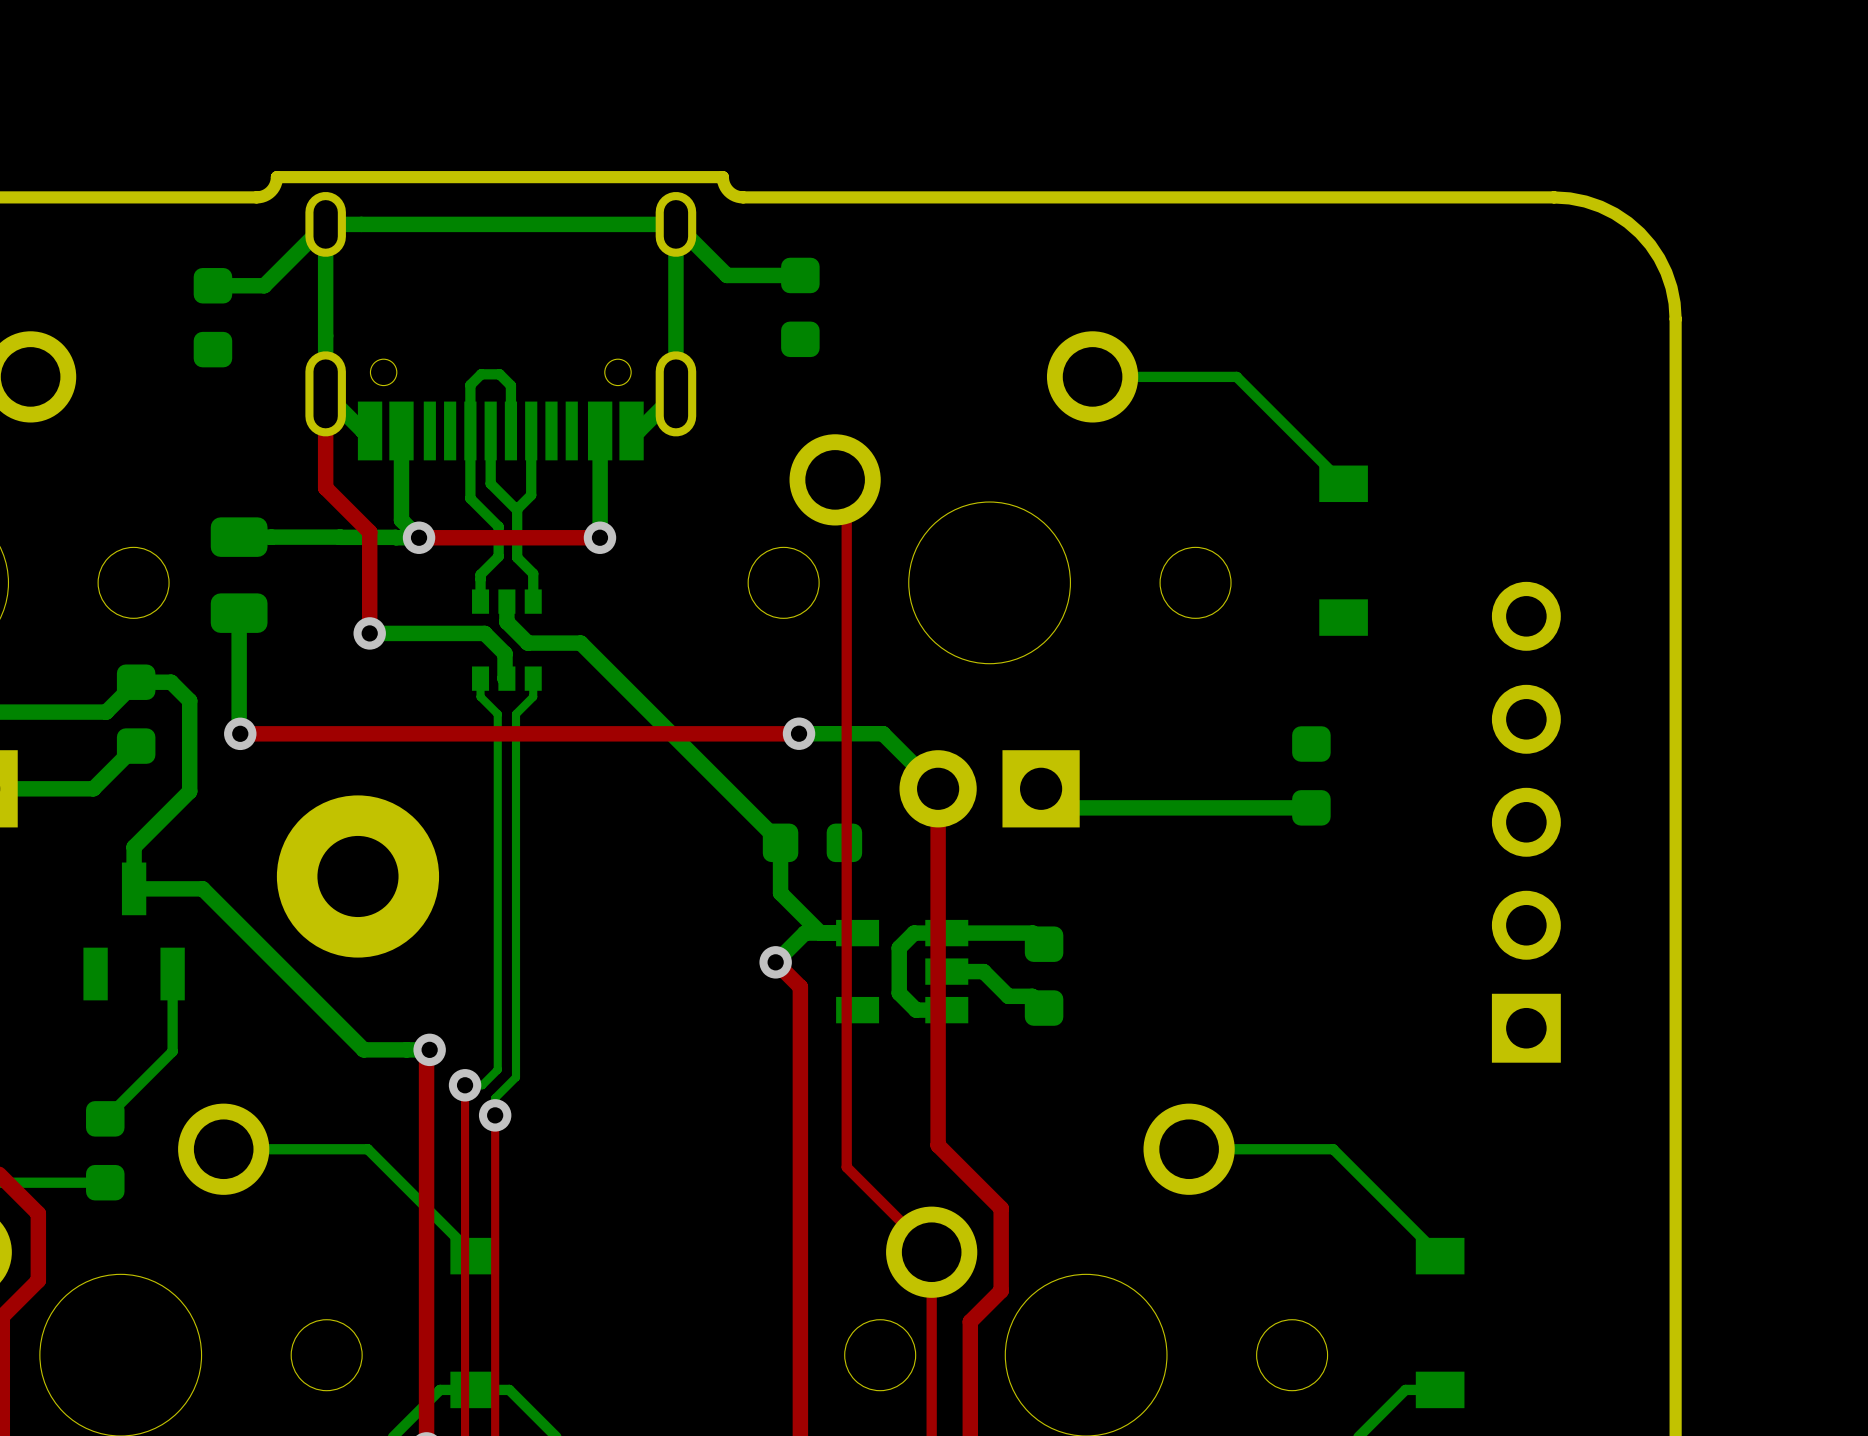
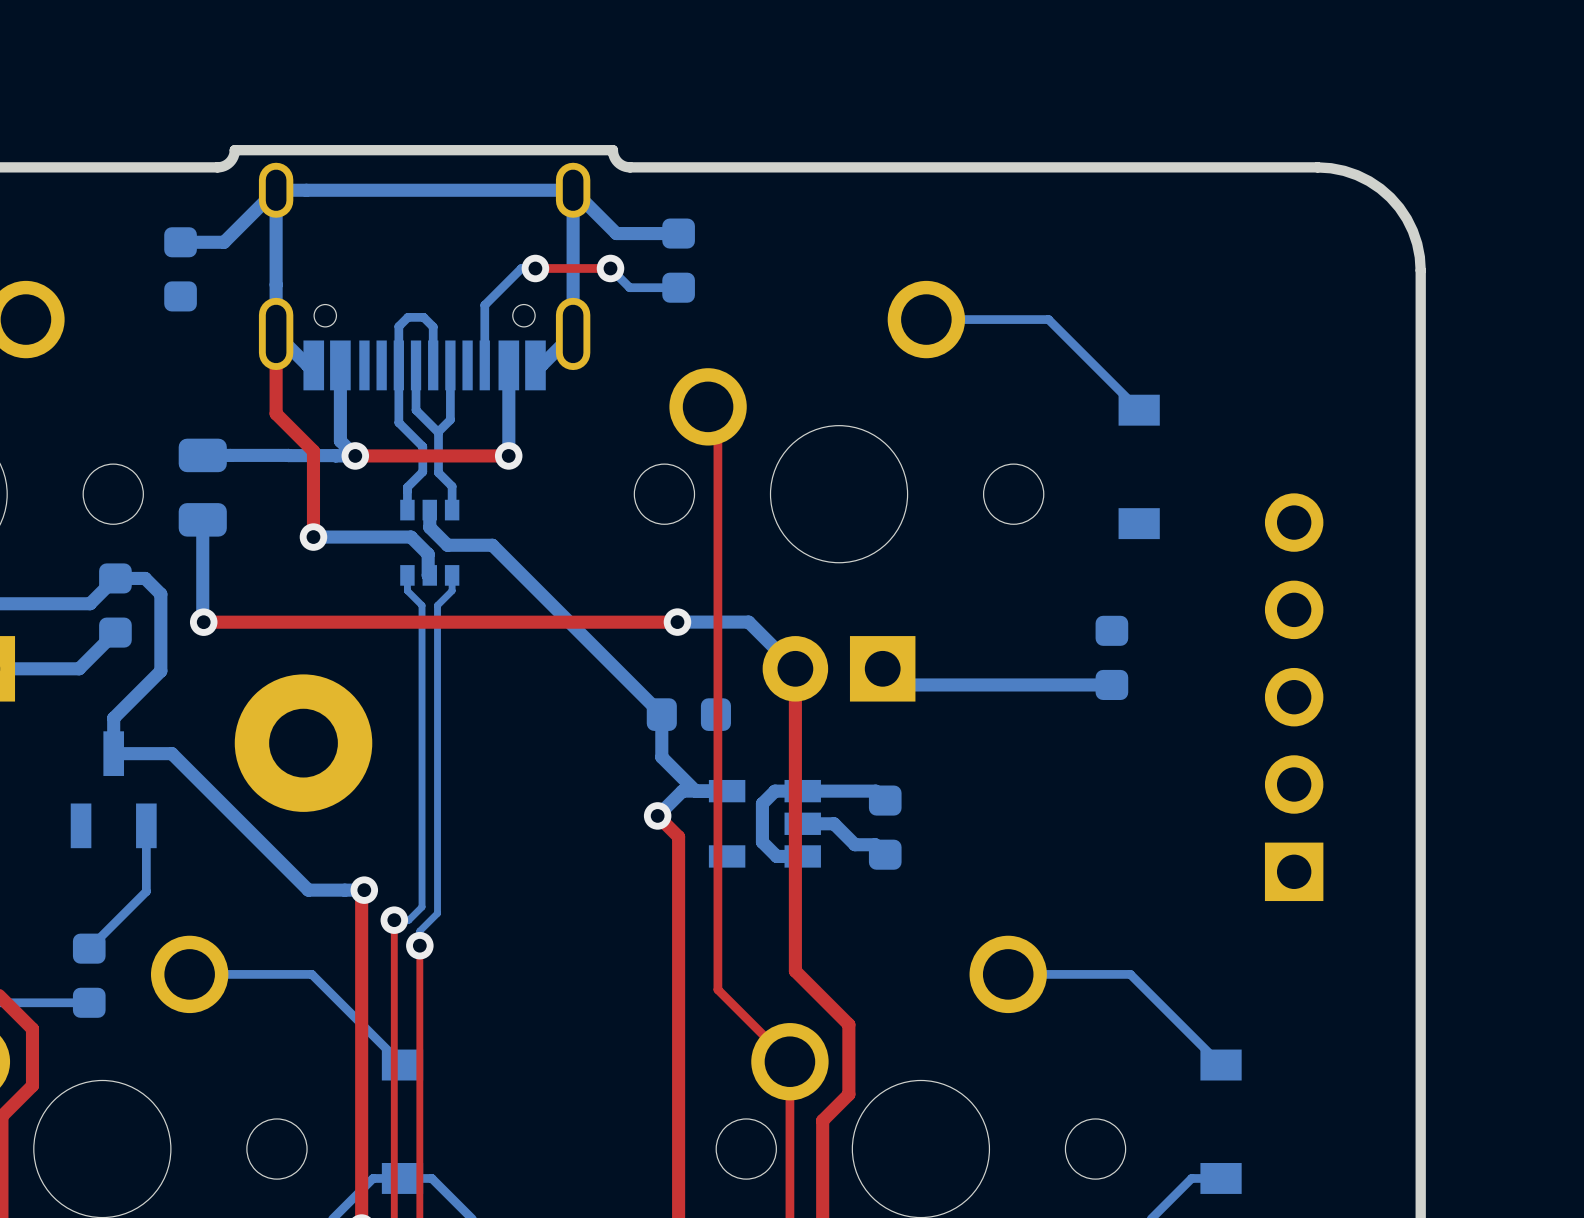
bottom track: none -> (535, 268) (521, 268) (484, 305) (484, 365)
top track: none -> (535, 268) (610, 268)
via: none -> (535, 268)
bottom track: none -> (610, 268) (629, 287) (678, 287)
via: none -> (610, 268)

